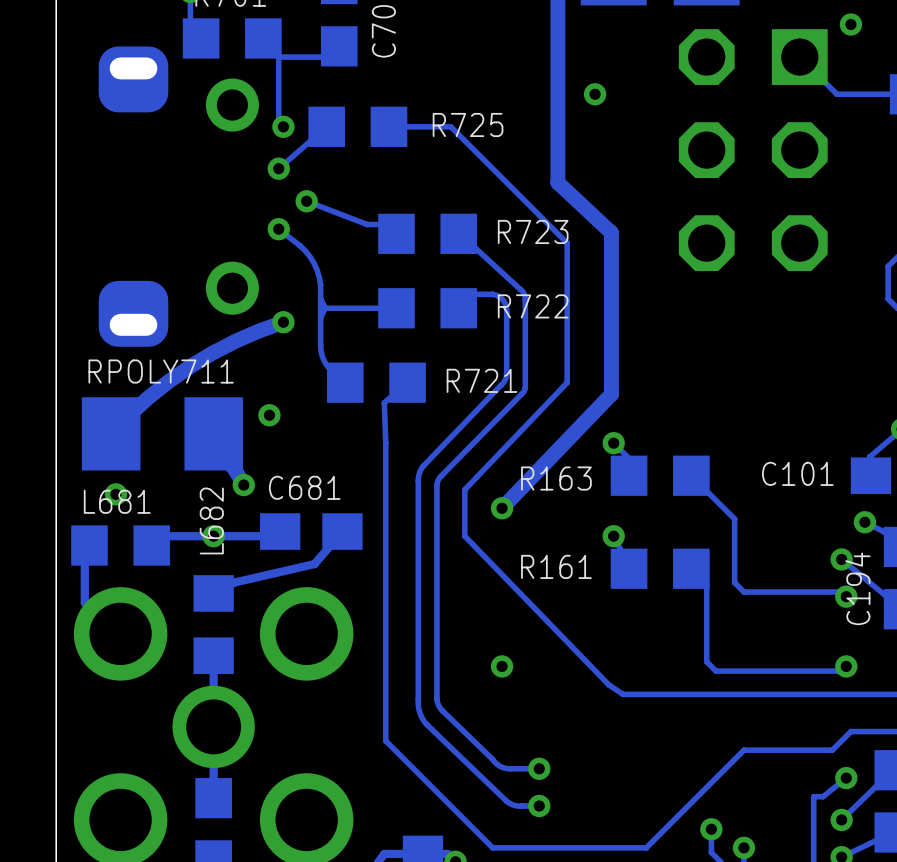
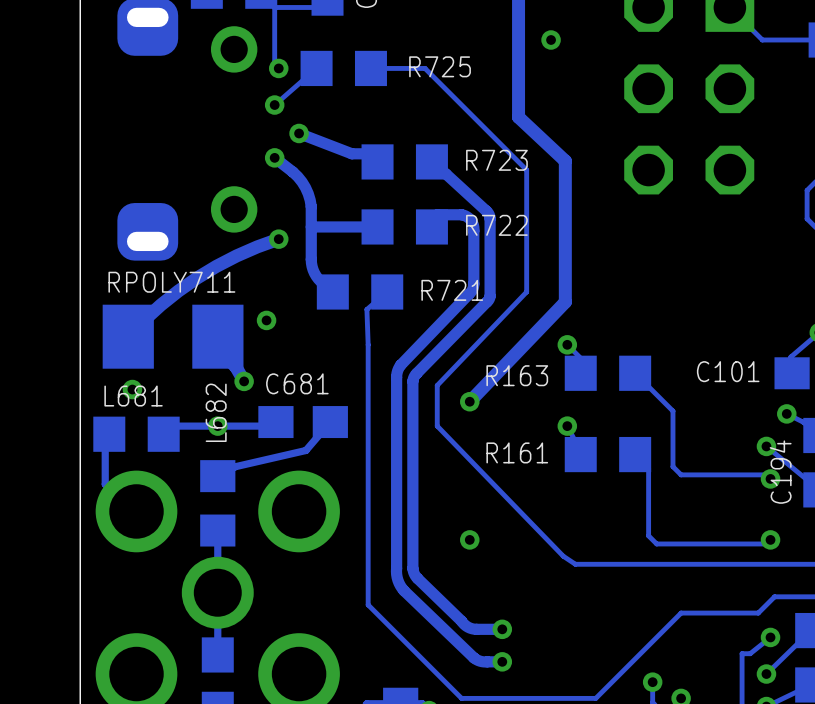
track width: thin (306, 201) (367, 224) (390, 224) -> thick (299, 133) (351, 153) (372, 153)
track width: thin (278, 229) (305, 250) (317, 270) (320, 285) (321, 353) (328, 367) (345, 382) -> thick (274, 157) (297, 176) (308, 193) (311, 206) (312, 266) (318, 279) (332, 291)
track width: thin (458, 233) (524, 293) (525, 387) (523, 392) (437, 481) (437, 701) (442, 710) (497, 764) (507, 768) (539, 768) -> thick (431, 161) (489, 214) (490, 296) (488, 300) (413, 378) (413, 570) (417, 578) (466, 625) (474, 629) (502, 629)
track width: thin (396, 308) (320, 308) -> thick (377, 226) (311, 226)
track width: thin (458, 308) (463, 303) (464, 294) (492, 294) (503, 300) (506, 310) (506, 375) (502, 383) (422, 466) (418, 475) (418, 705) (421, 715) (426, 724) (506, 801) (515, 805) (539, 806) -> thick (431, 226) (436, 222) (437, 214) (461, 214) (471, 220) (473, 229) (473, 285) (470, 293) (400, 365) (397, 373) (396, 574) (404, 590) (473, 657) (481, 661) (502, 661)

